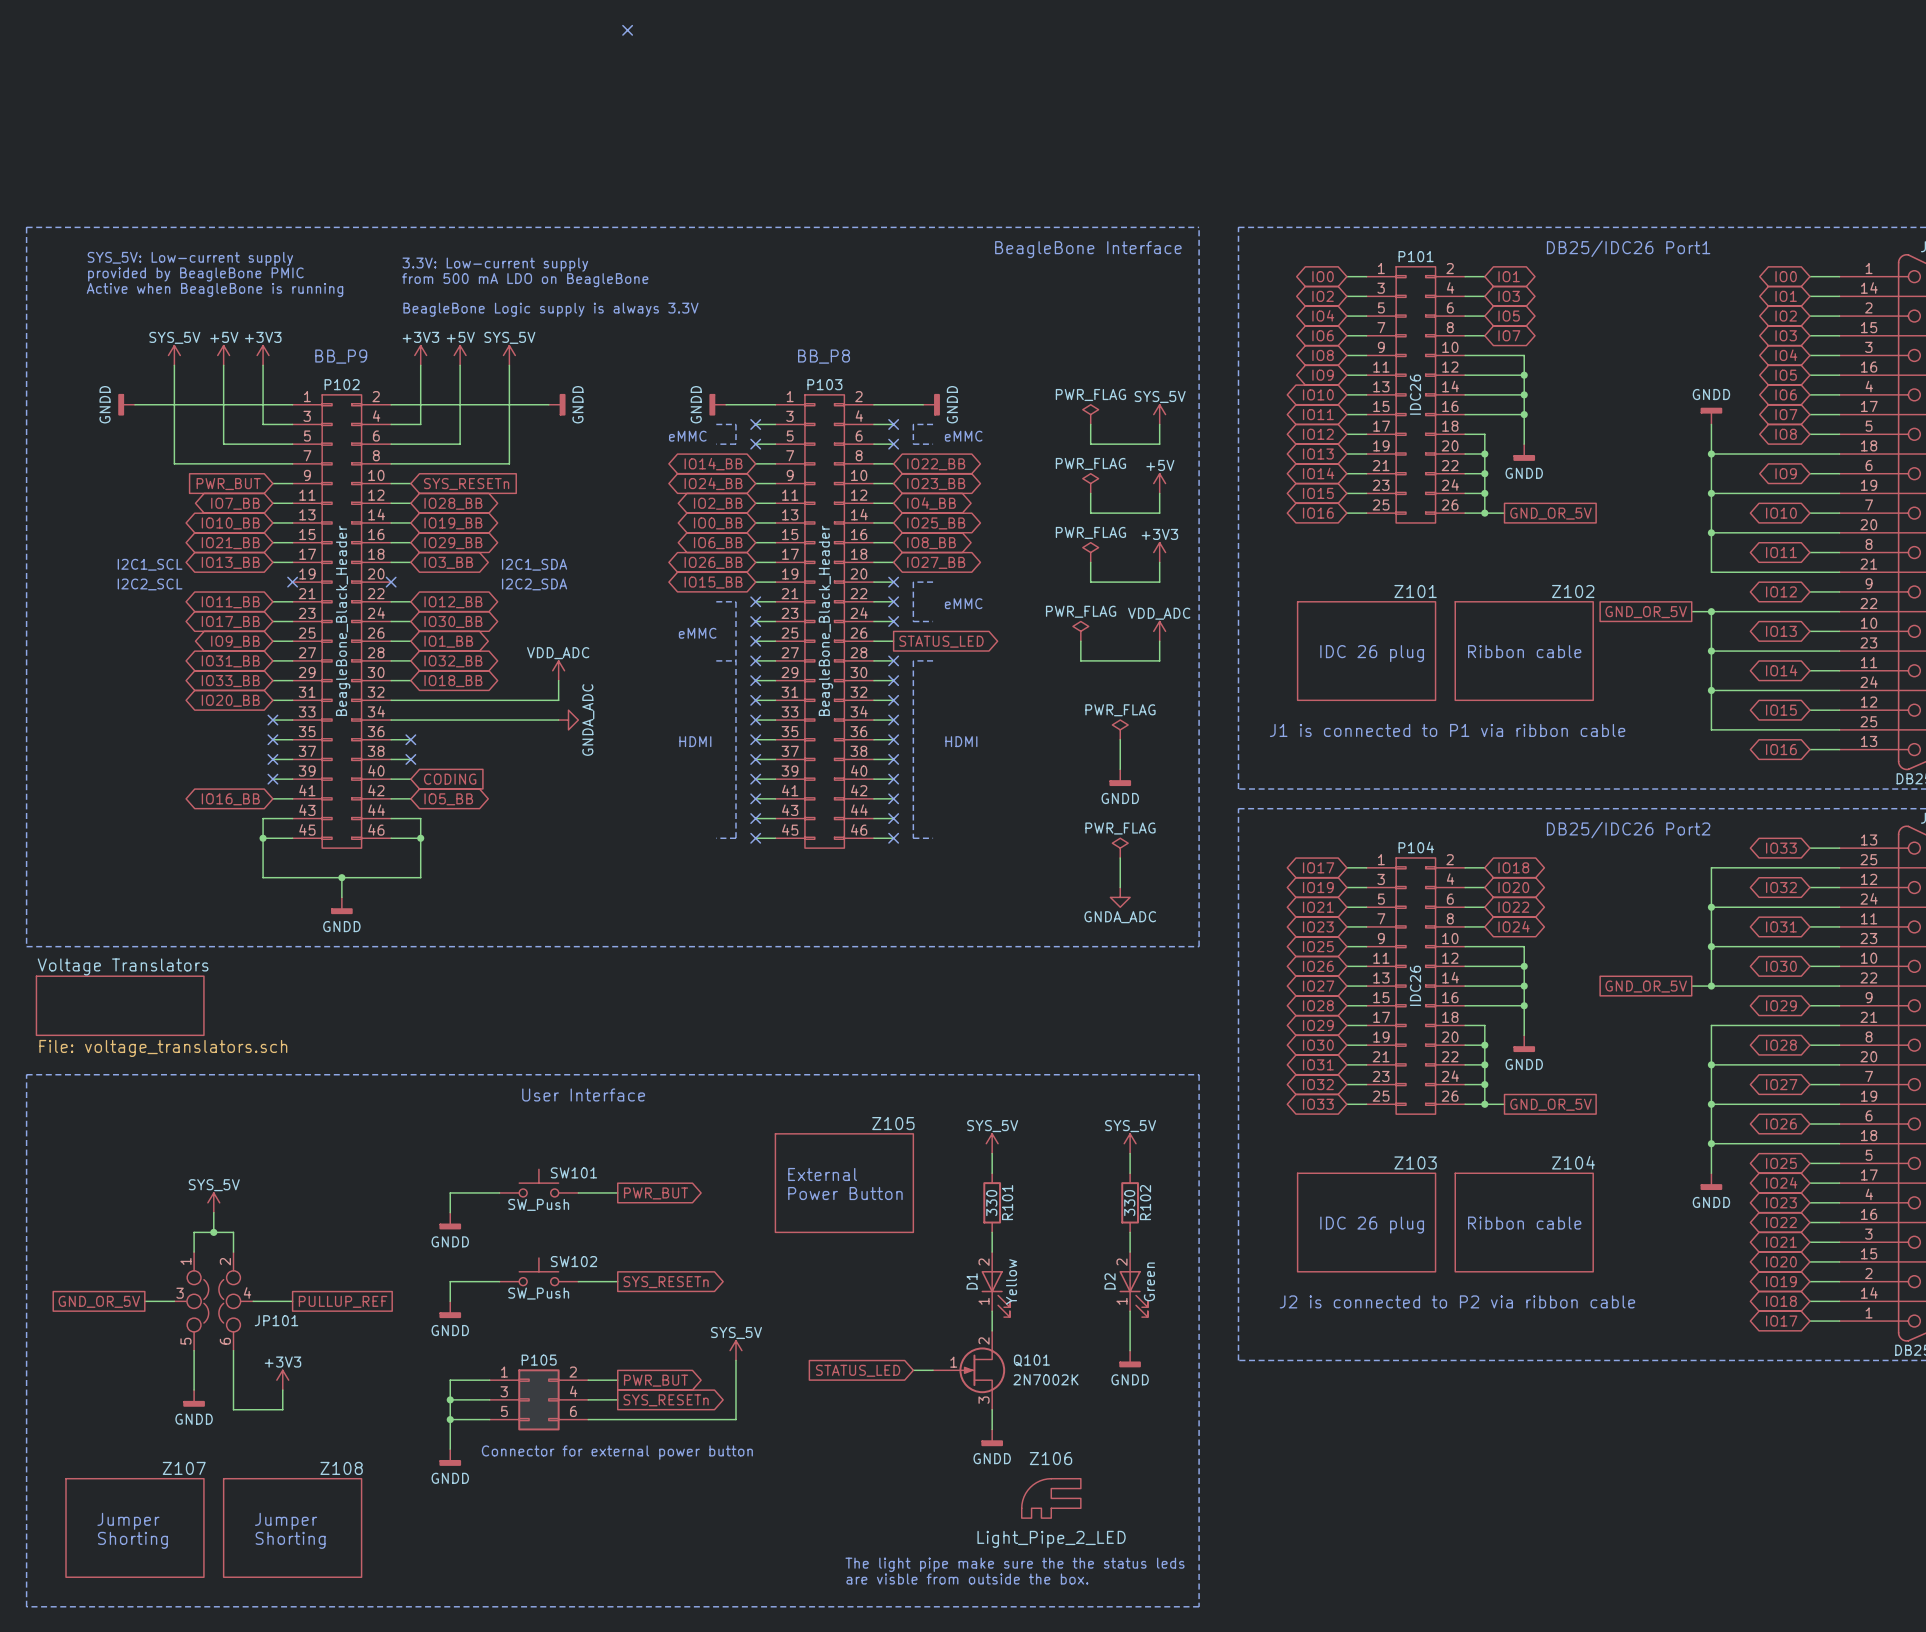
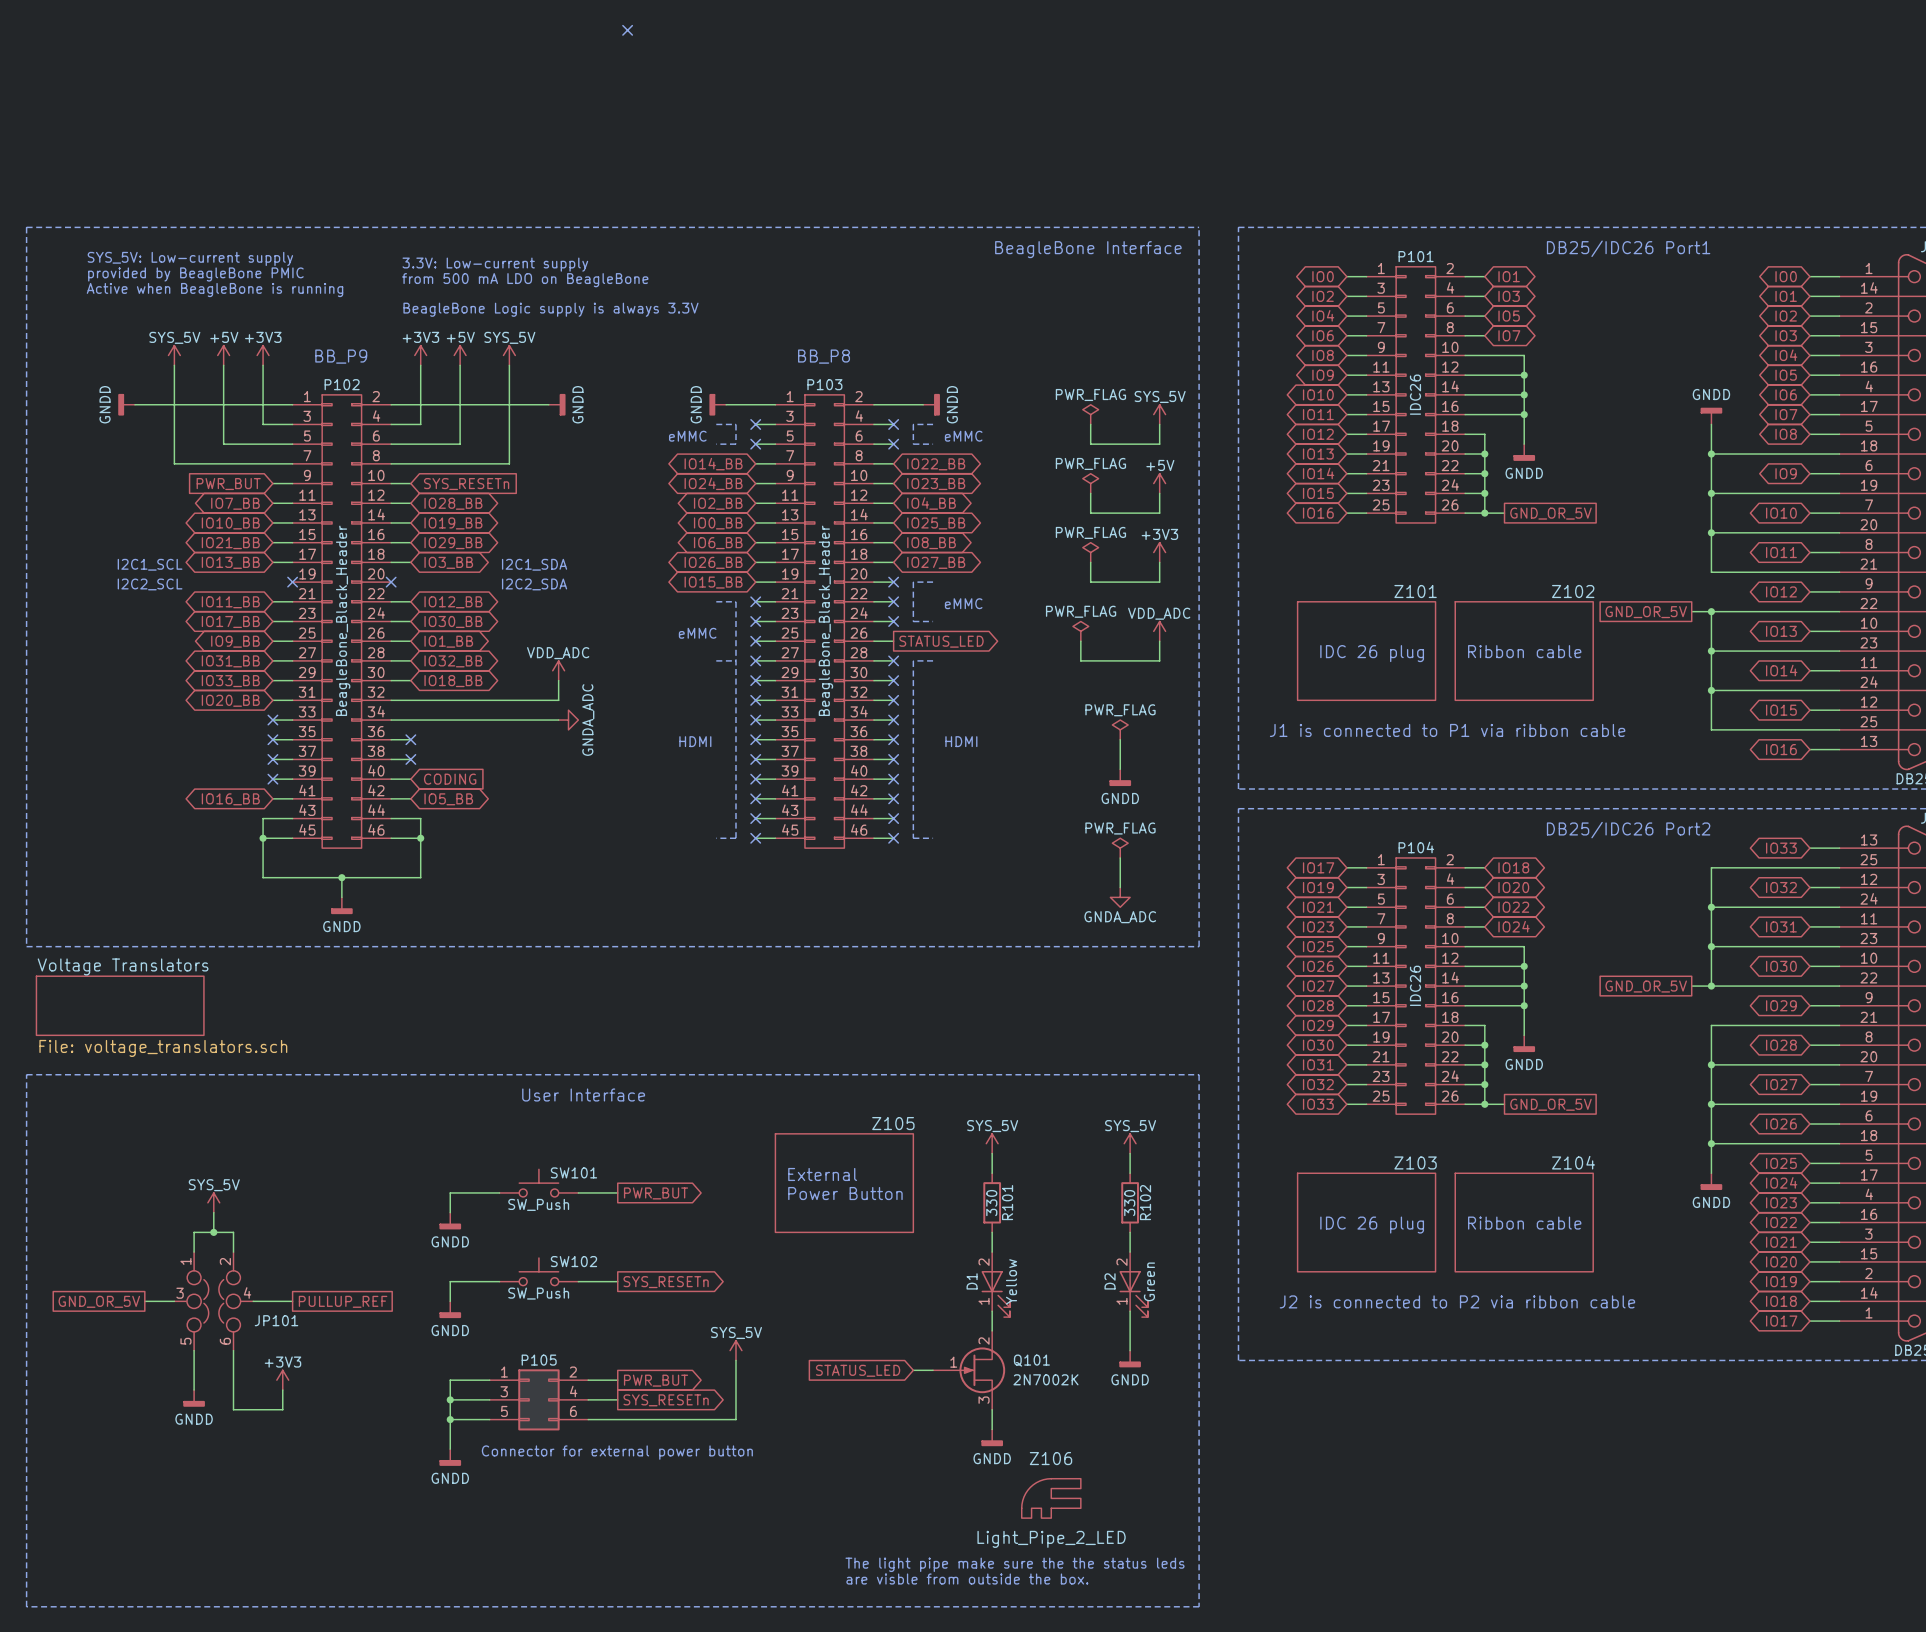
text: Jumper (128, 1521) -> none
text: Jumper (286, 1521) -> none
Z107: (134, 1527) -> none
Z108: (292, 1527) -> none
text: Shorting (132, 1540) -> none
text: Shorting (290, 1540) -> none

